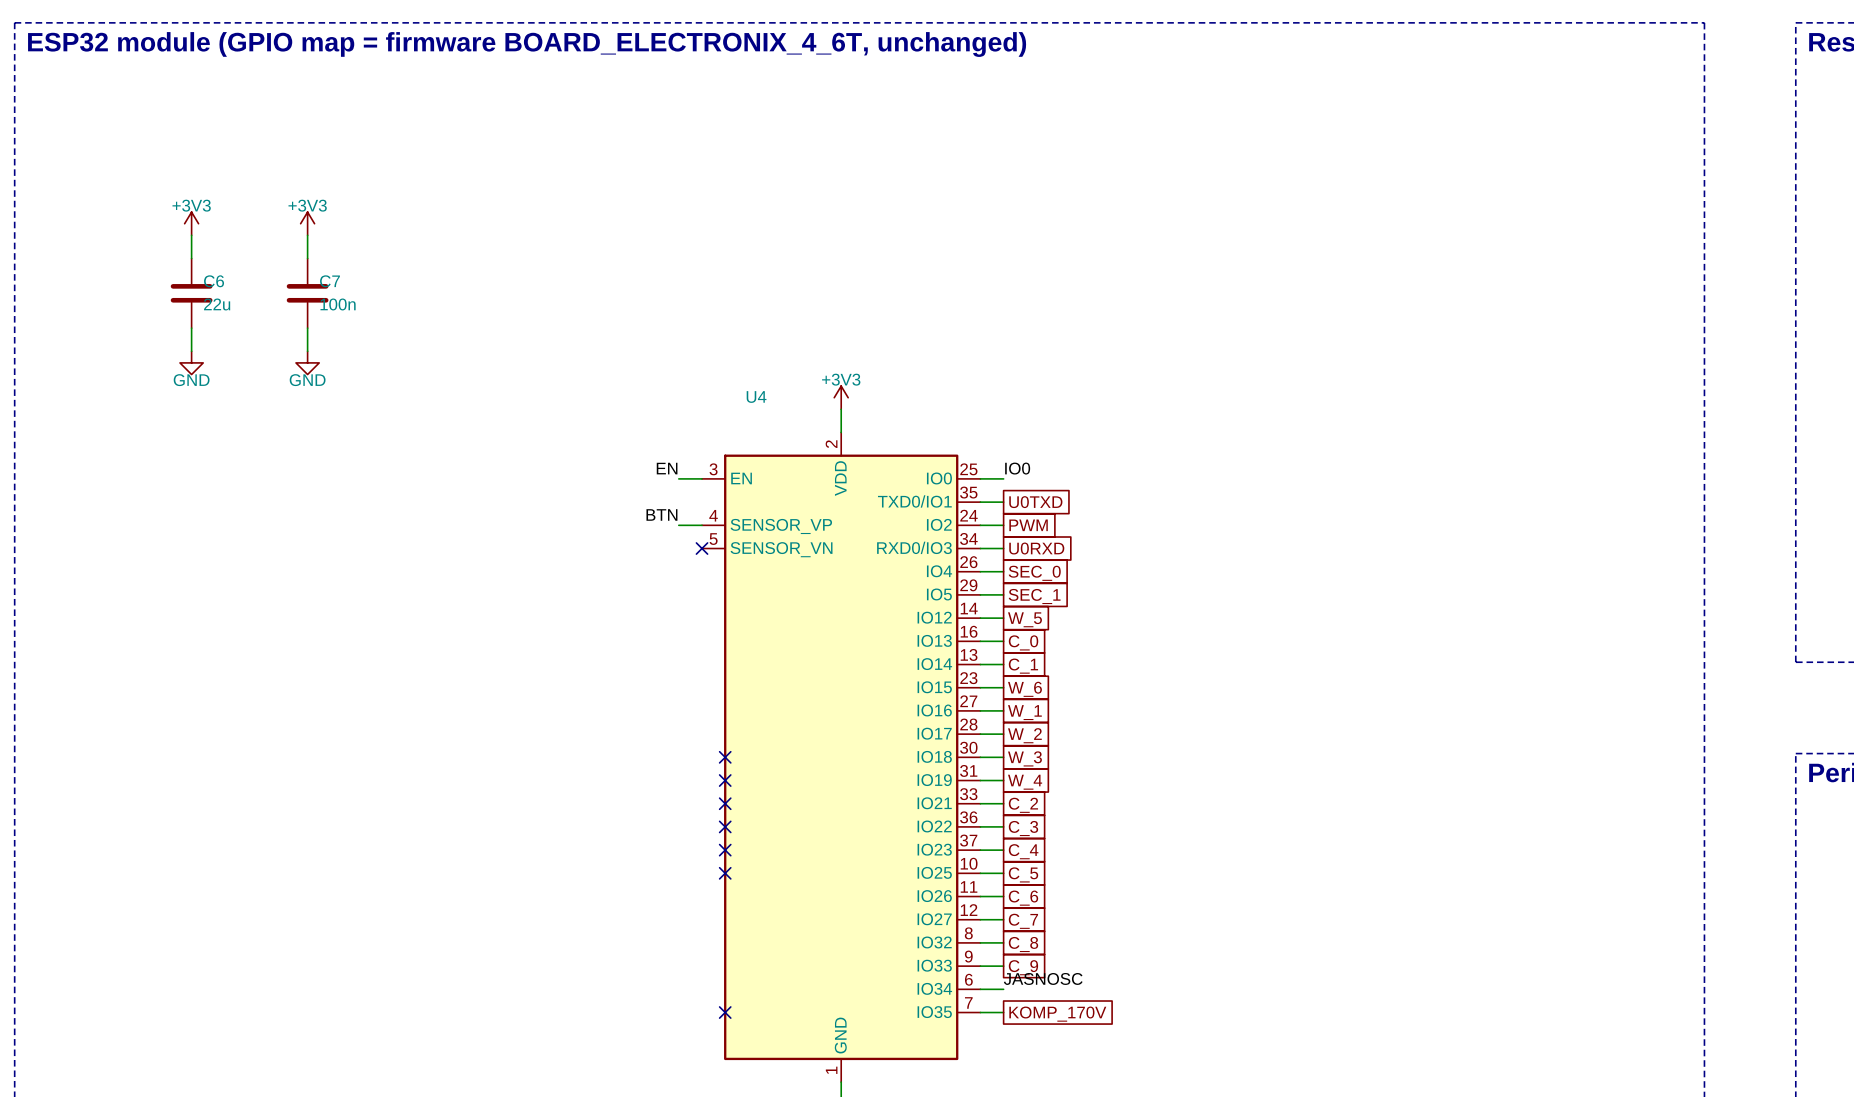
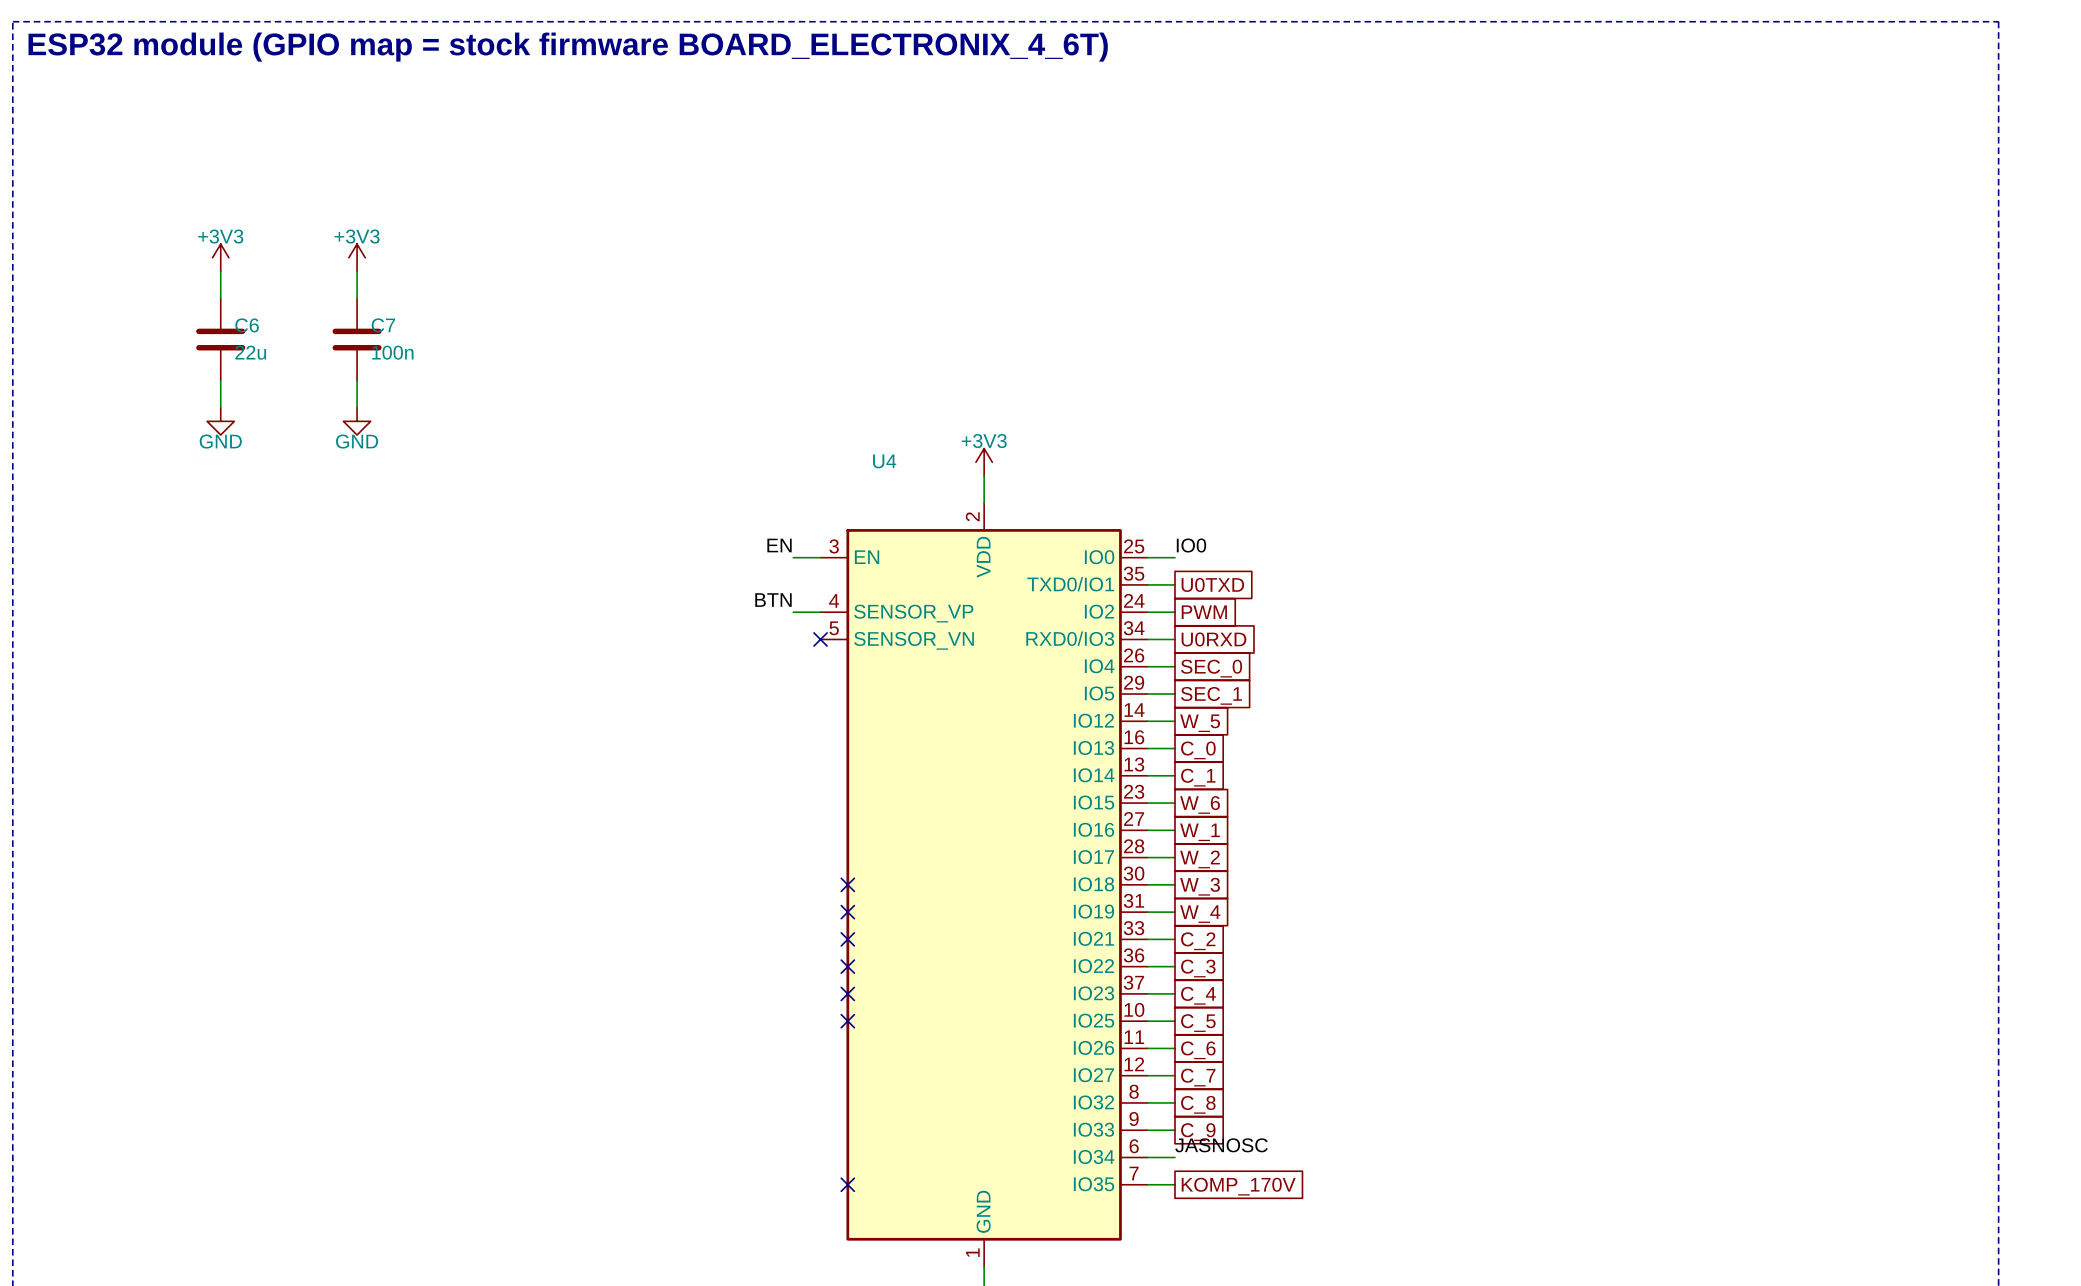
text: ESP32 module (GPIO map = firmware BOARD_ELECTRONIX_4_6T, unchanged) (527, 44) -> ESP32 module (GPIO map = stock firmware BOARD_ELECTRONIX_4_6T) (568, 47)

